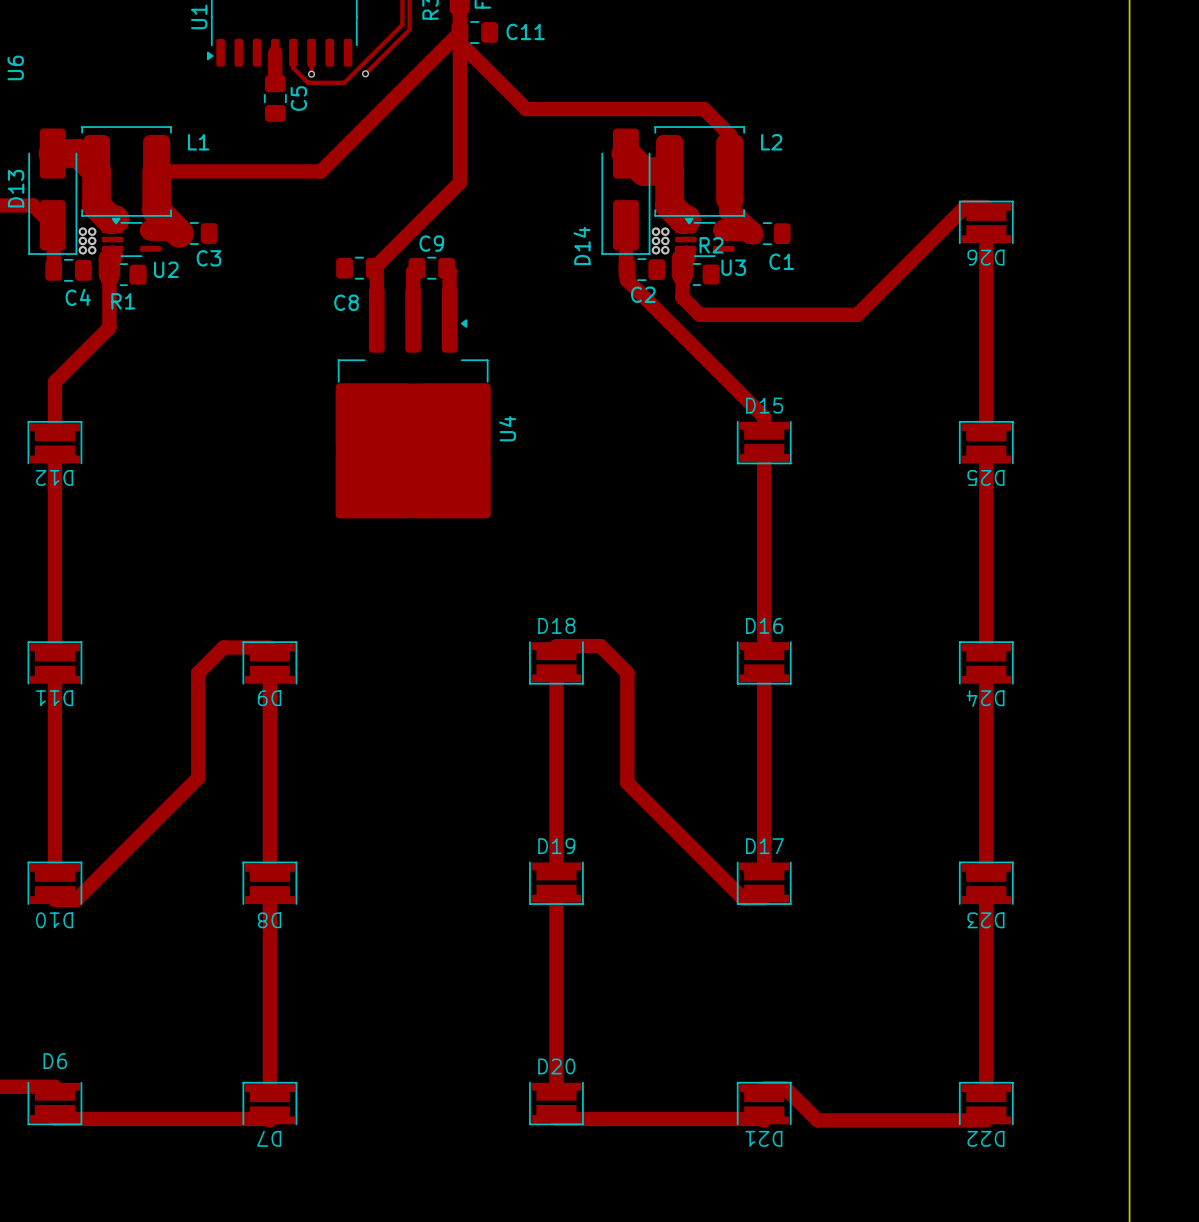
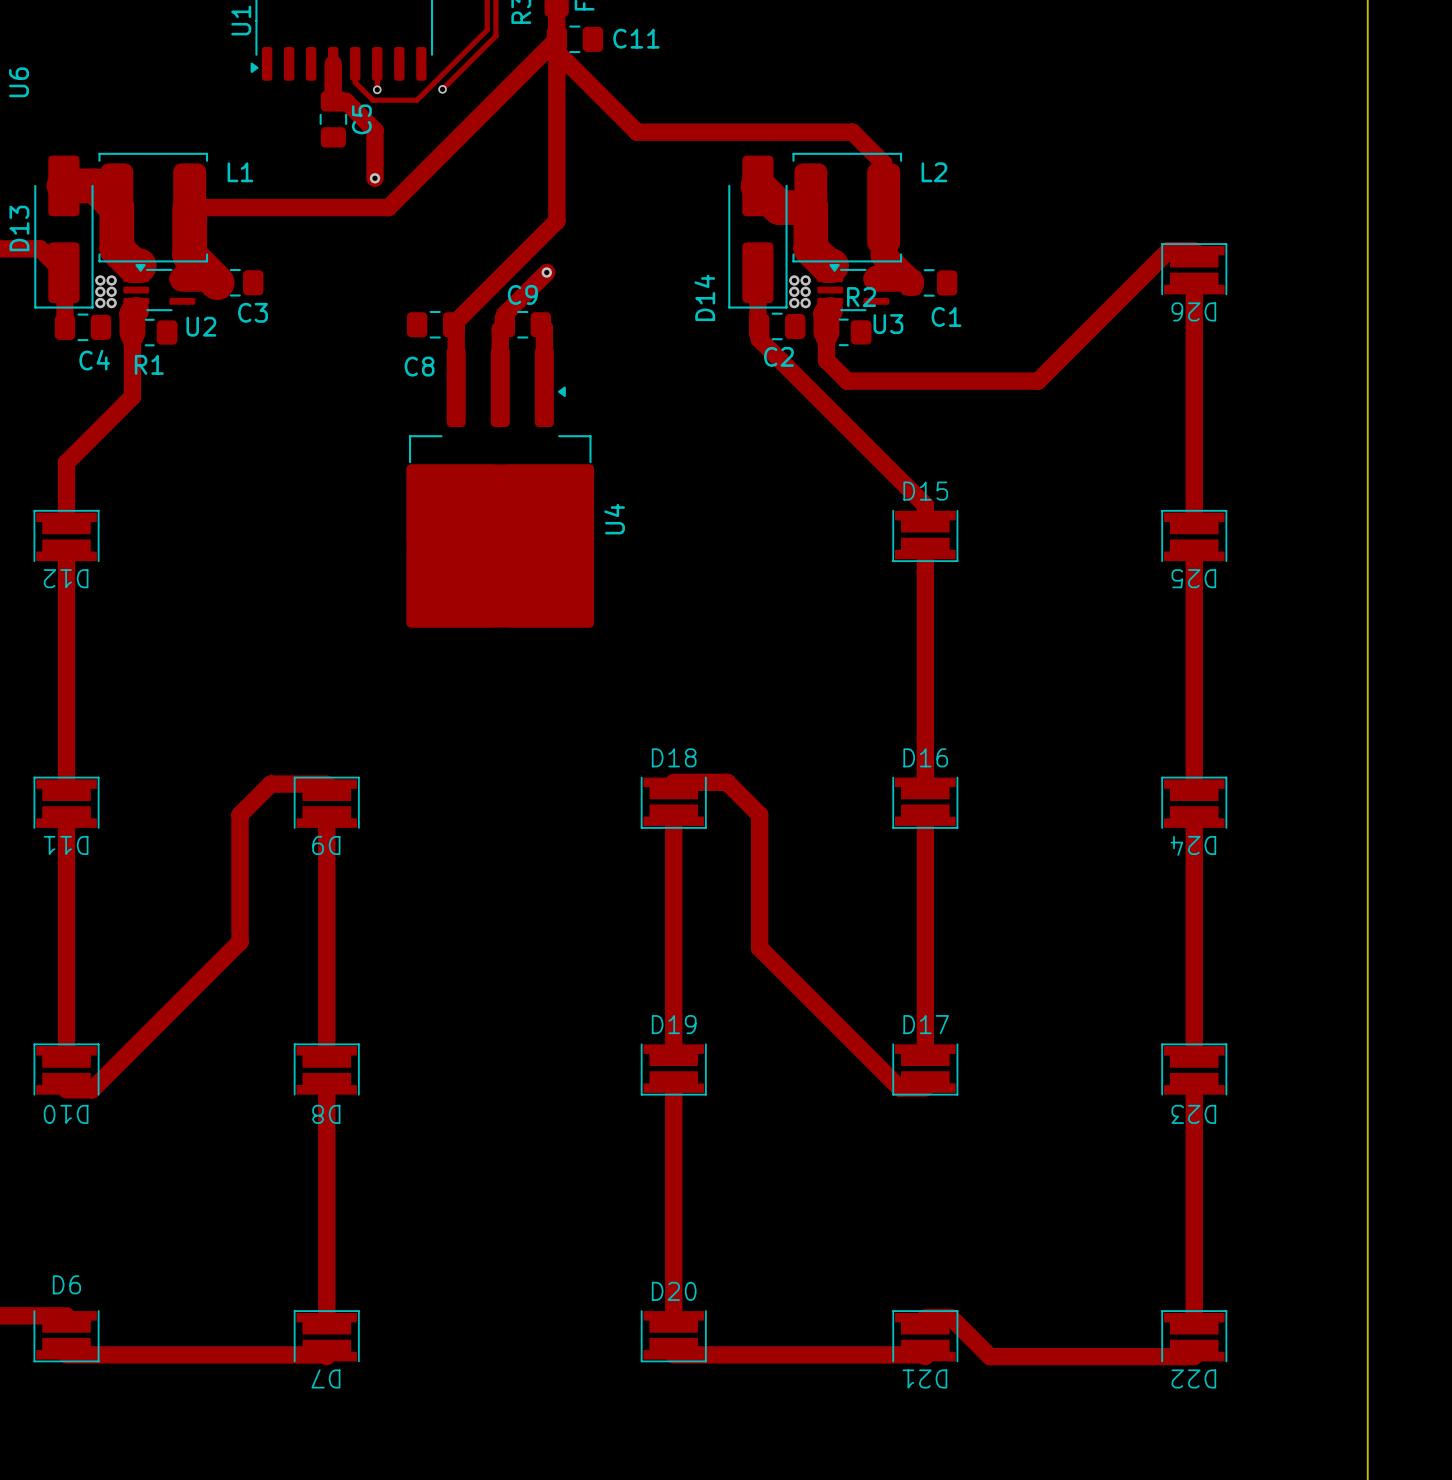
track: none -> (333, 101) (345, 101) (374, 130) (374, 178)
via: none -> (374, 178)
track: none -> (546, 272) (504, 314) (504, 324)
via: none -> (546, 272)

